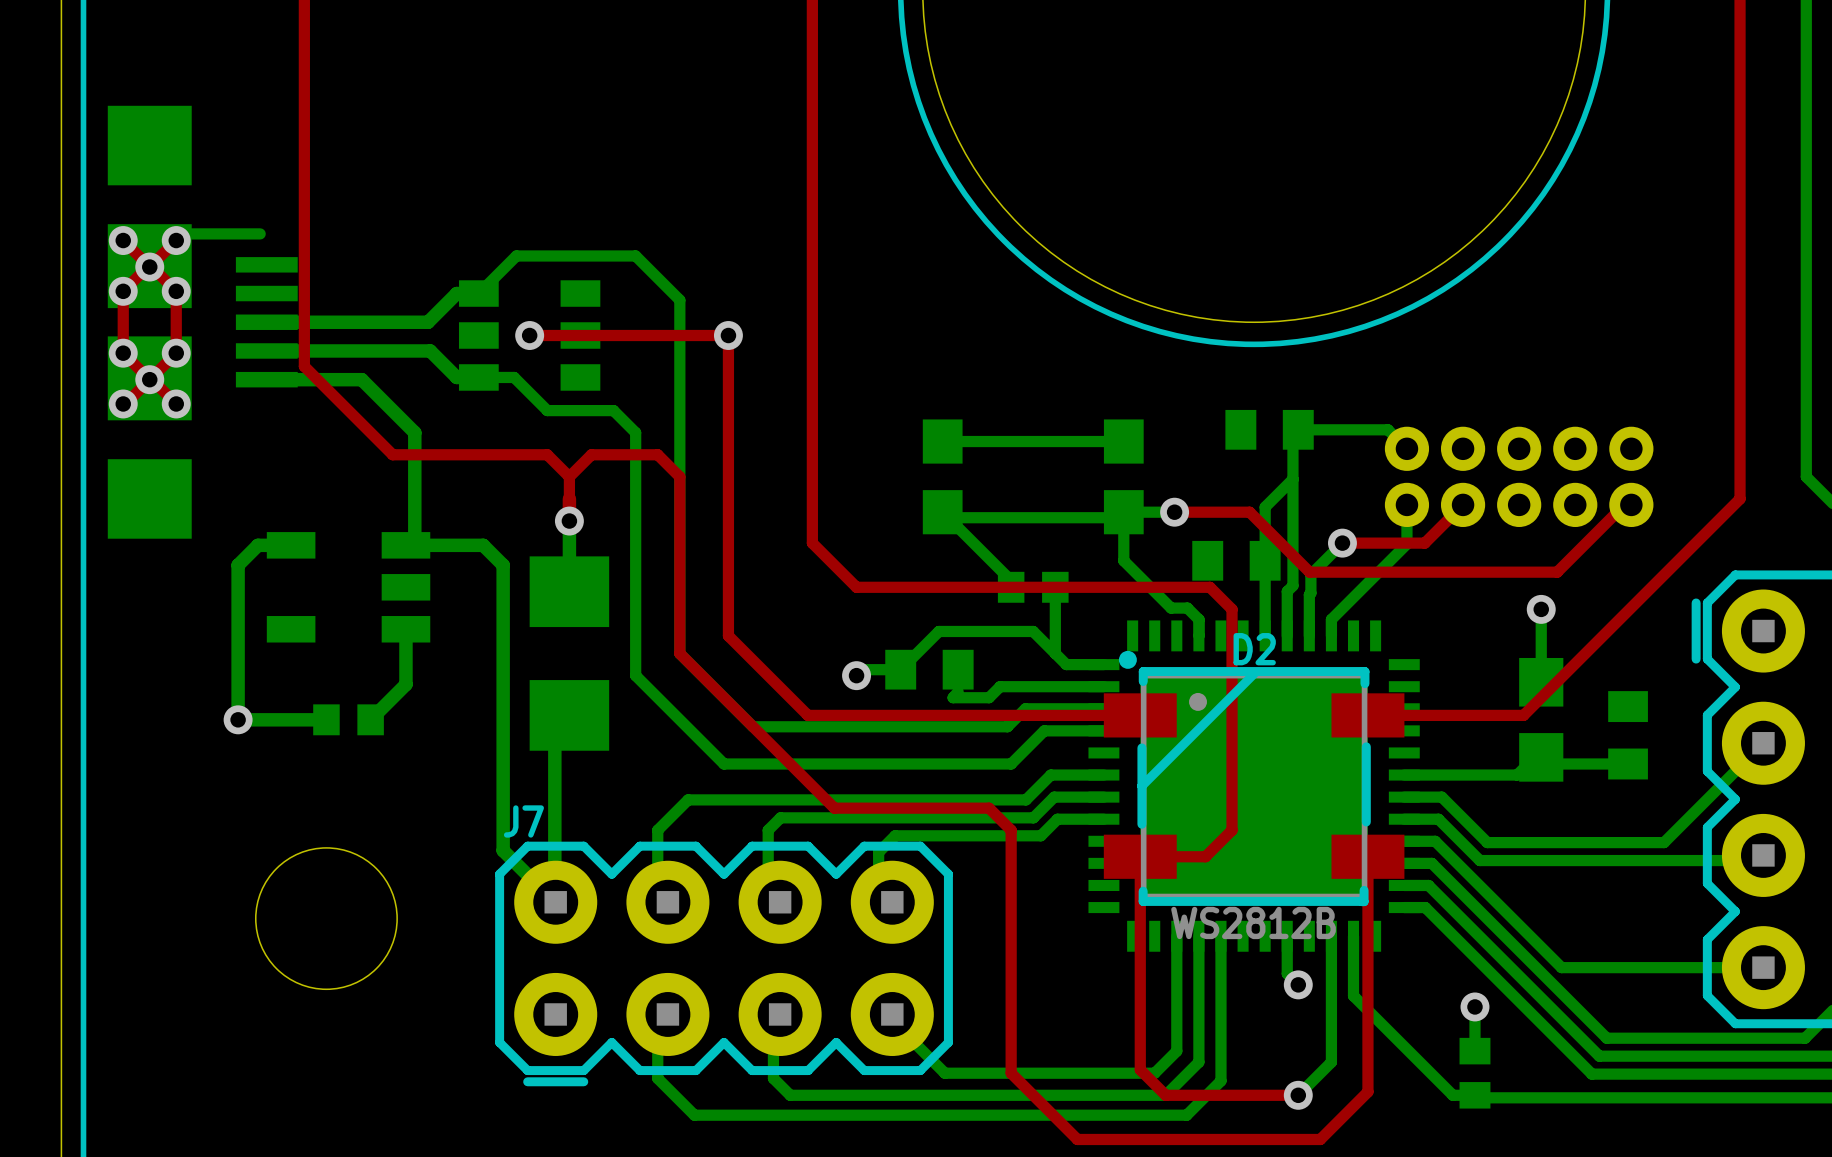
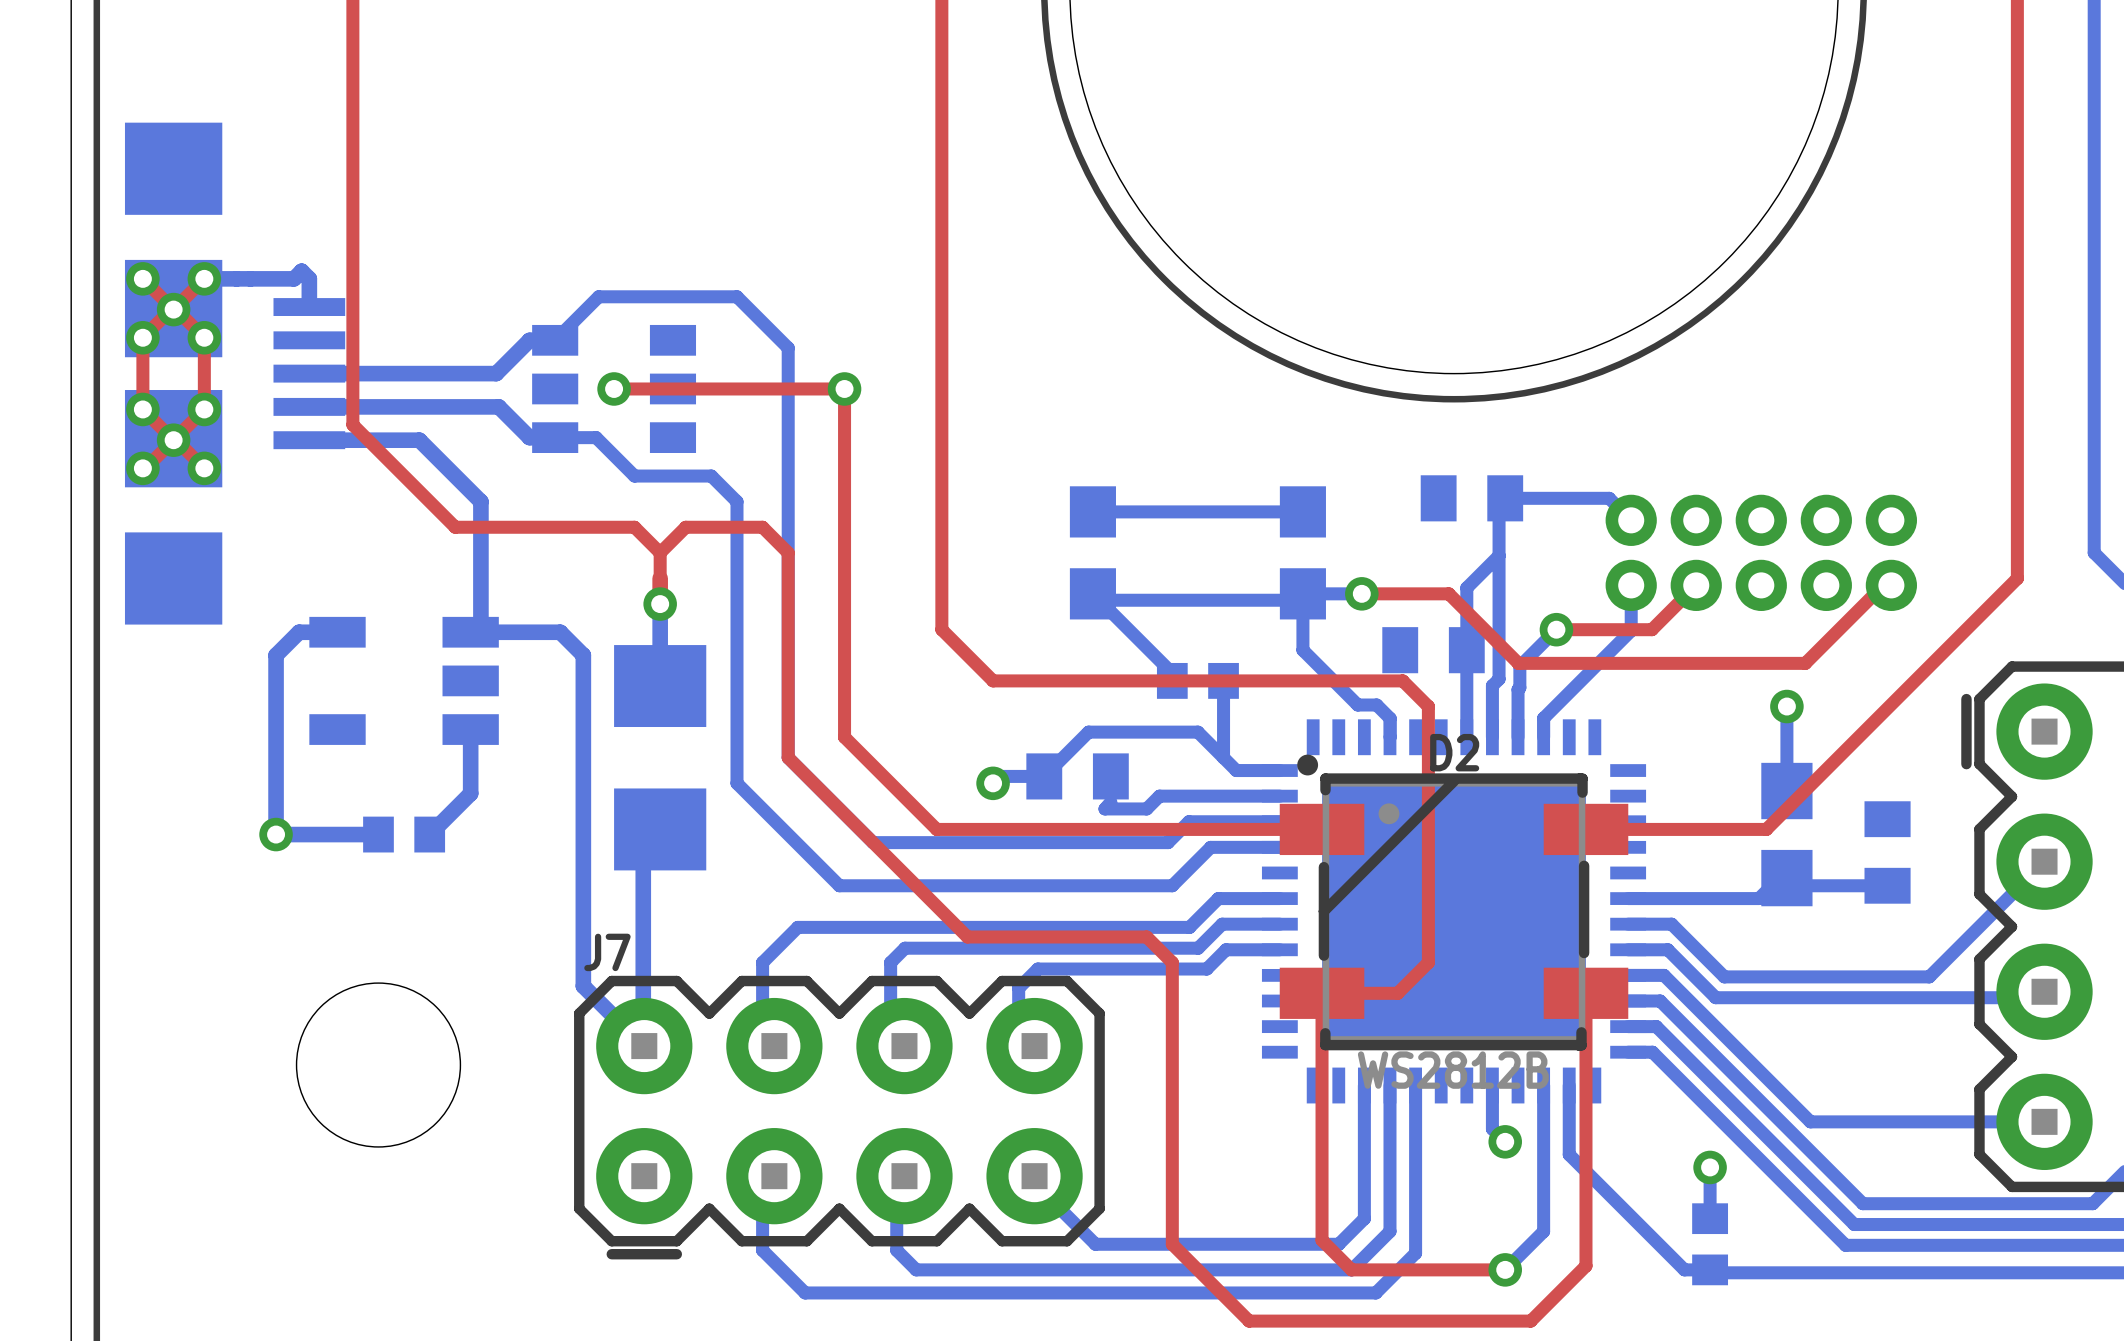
bottom track: (260, 233) (182, 233) (176, 240) -> (309, 307) (309, 278) (301, 271) (293, 278) (204, 278)

